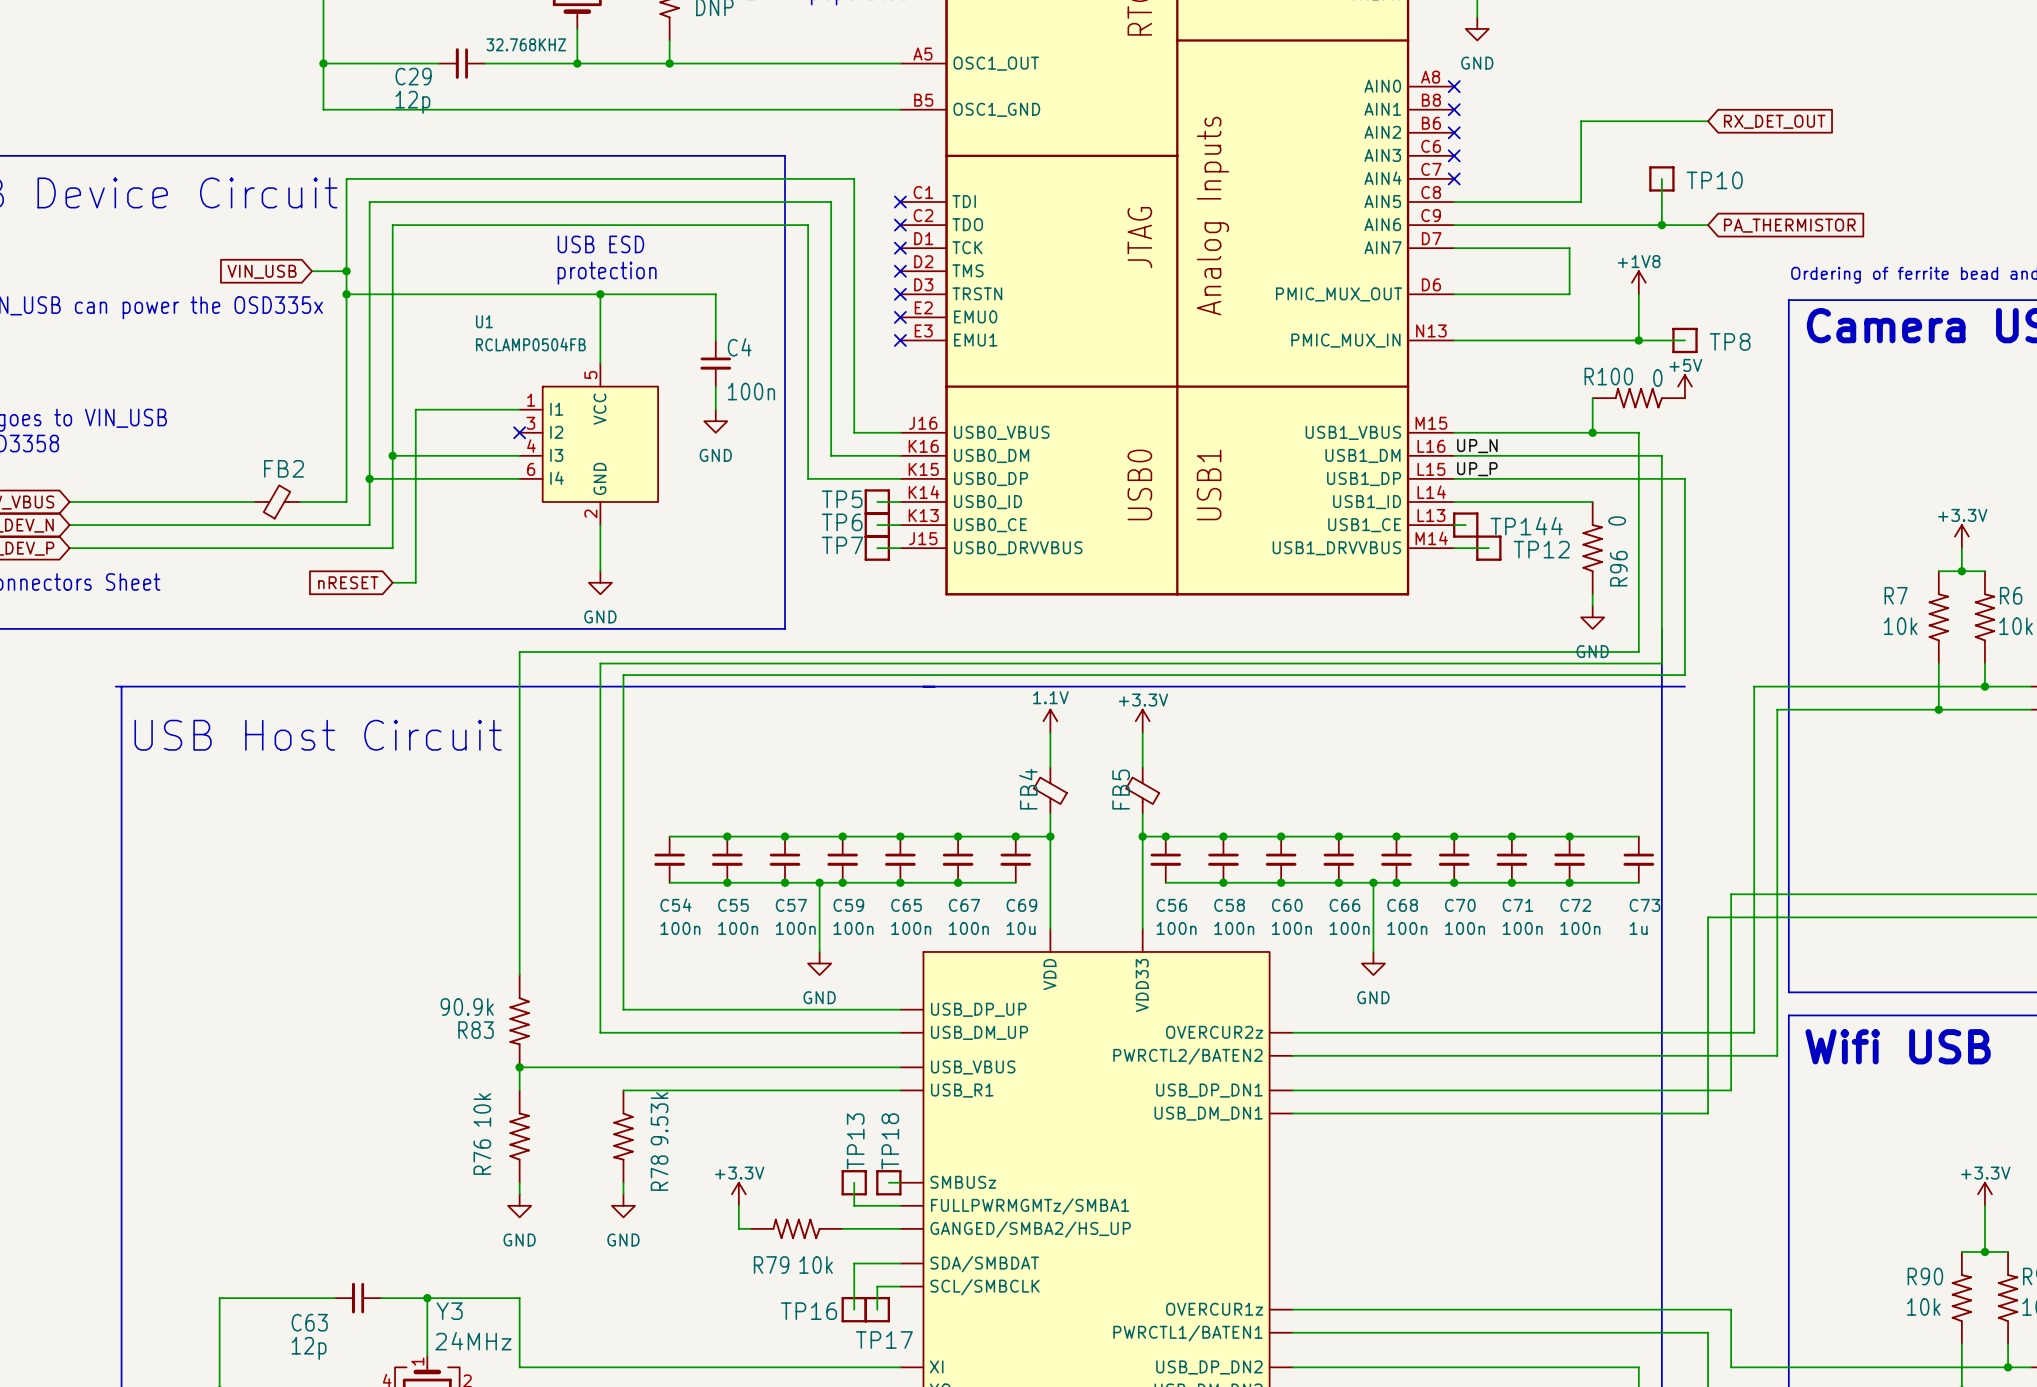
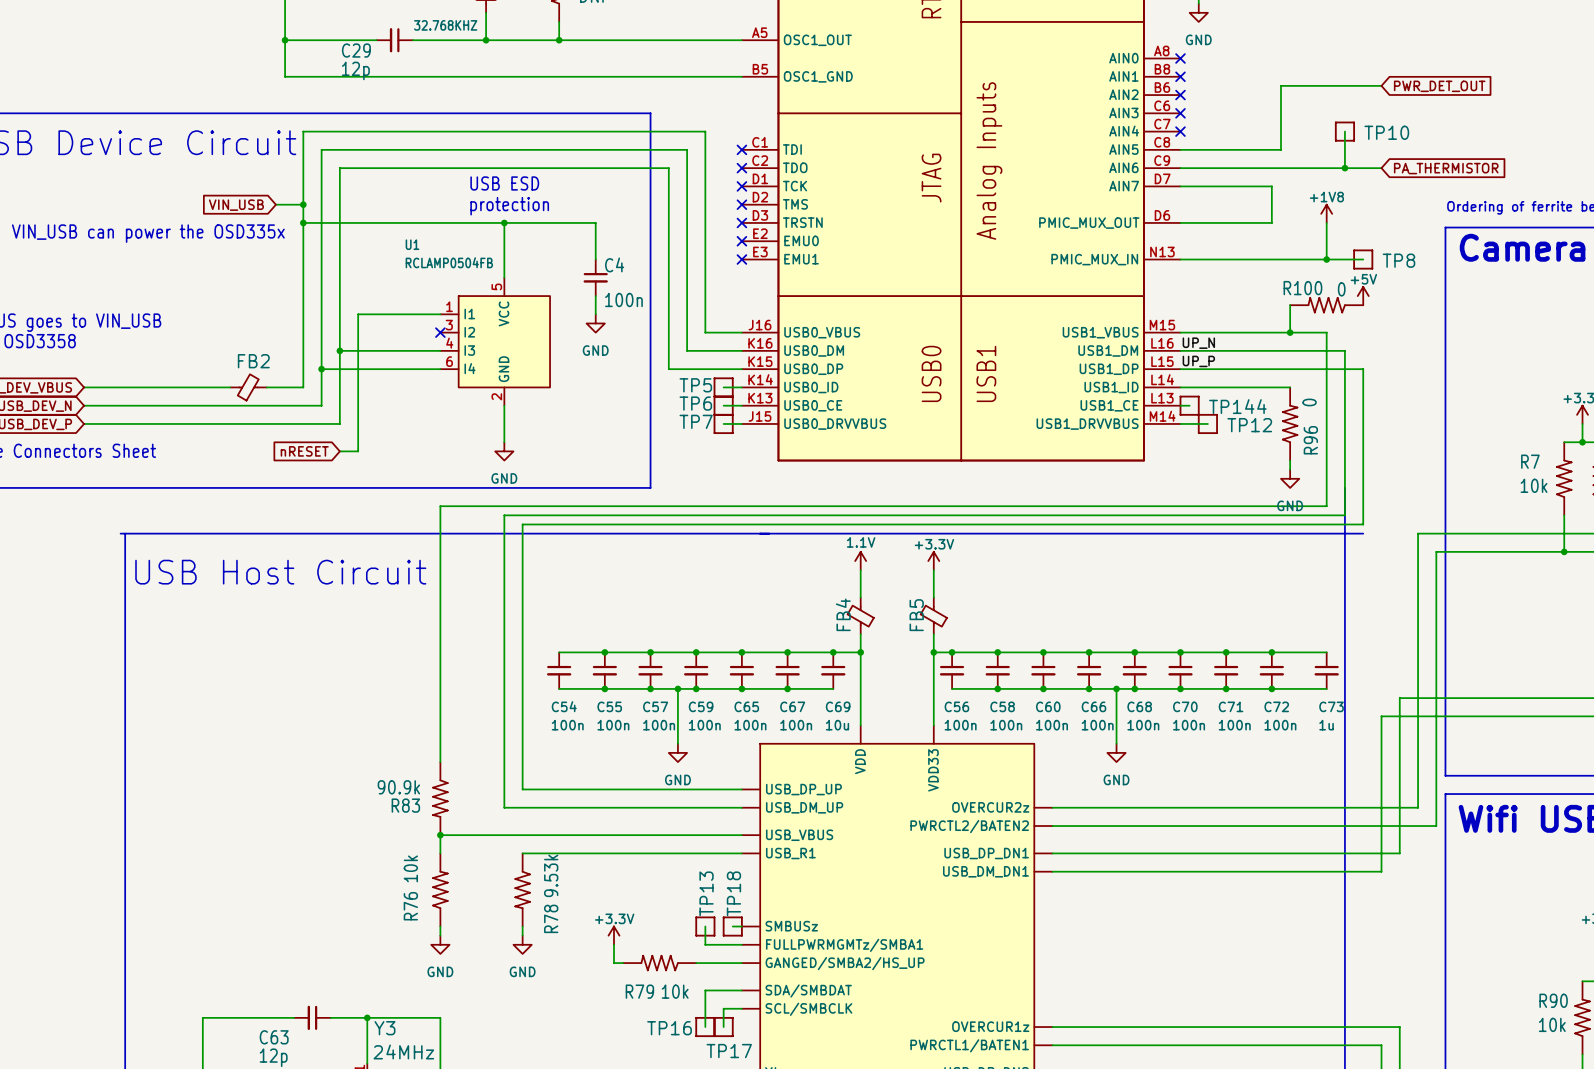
global label: RX_DET_OUT (1774, 121) -> PWR_DET_OUT (1439, 86)

